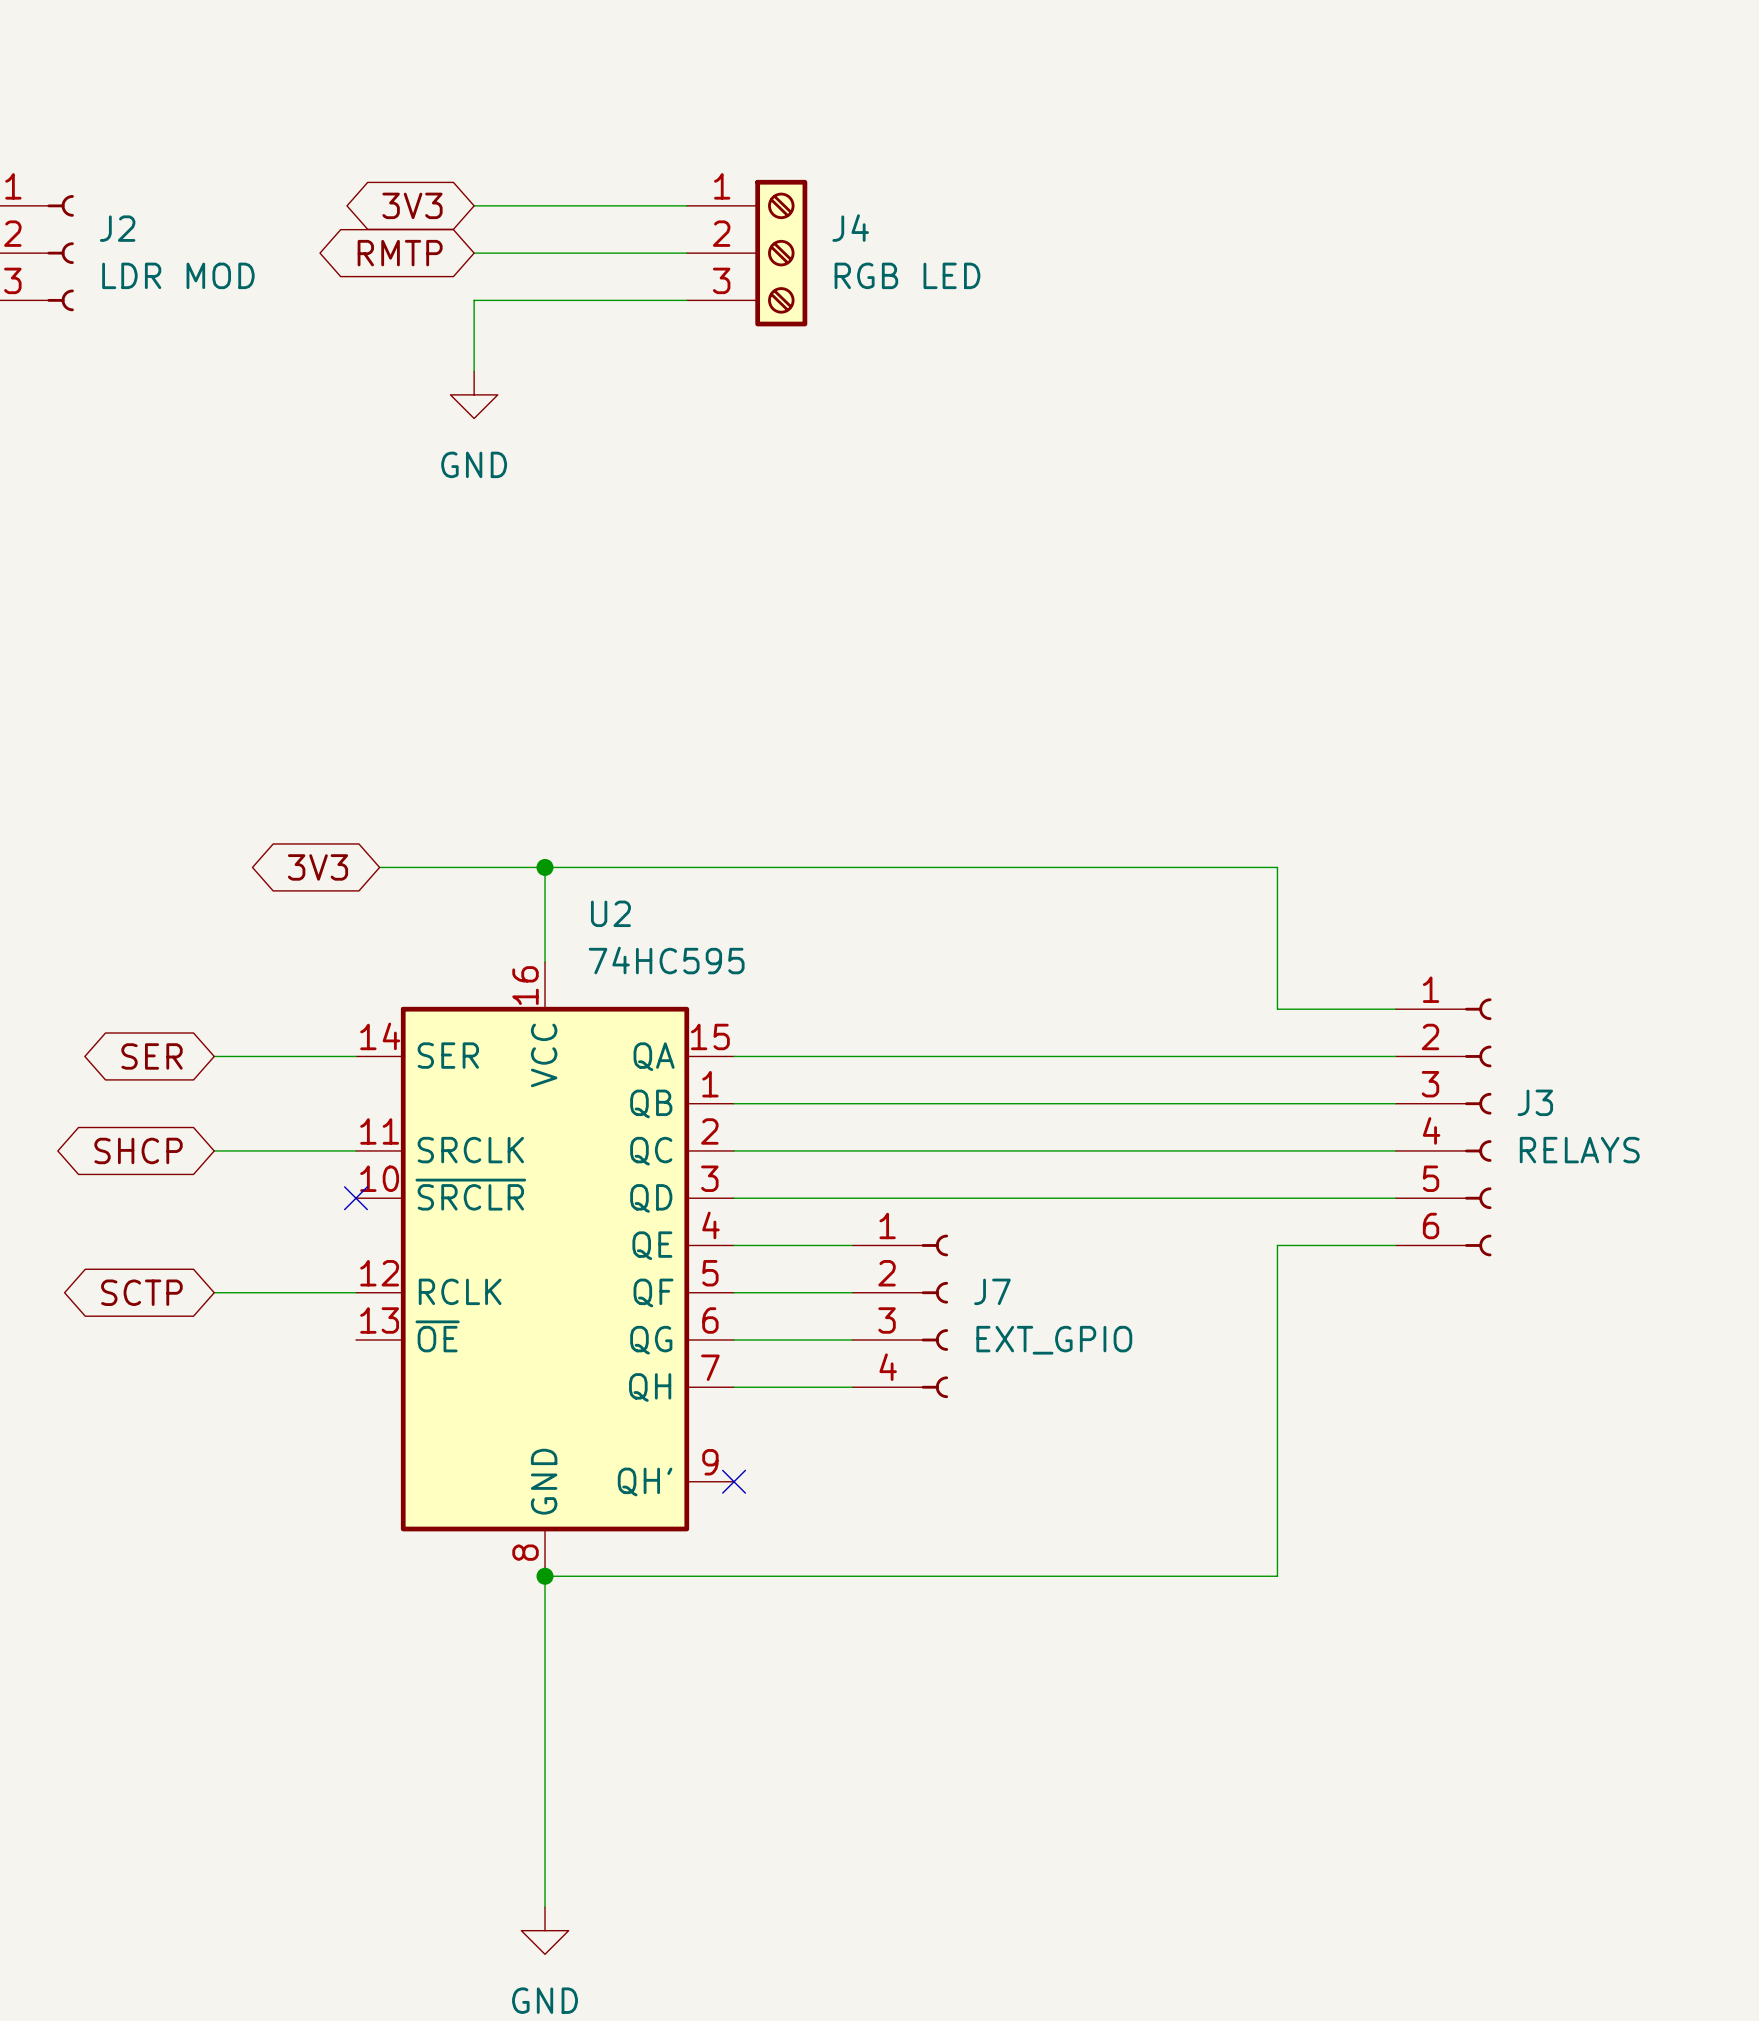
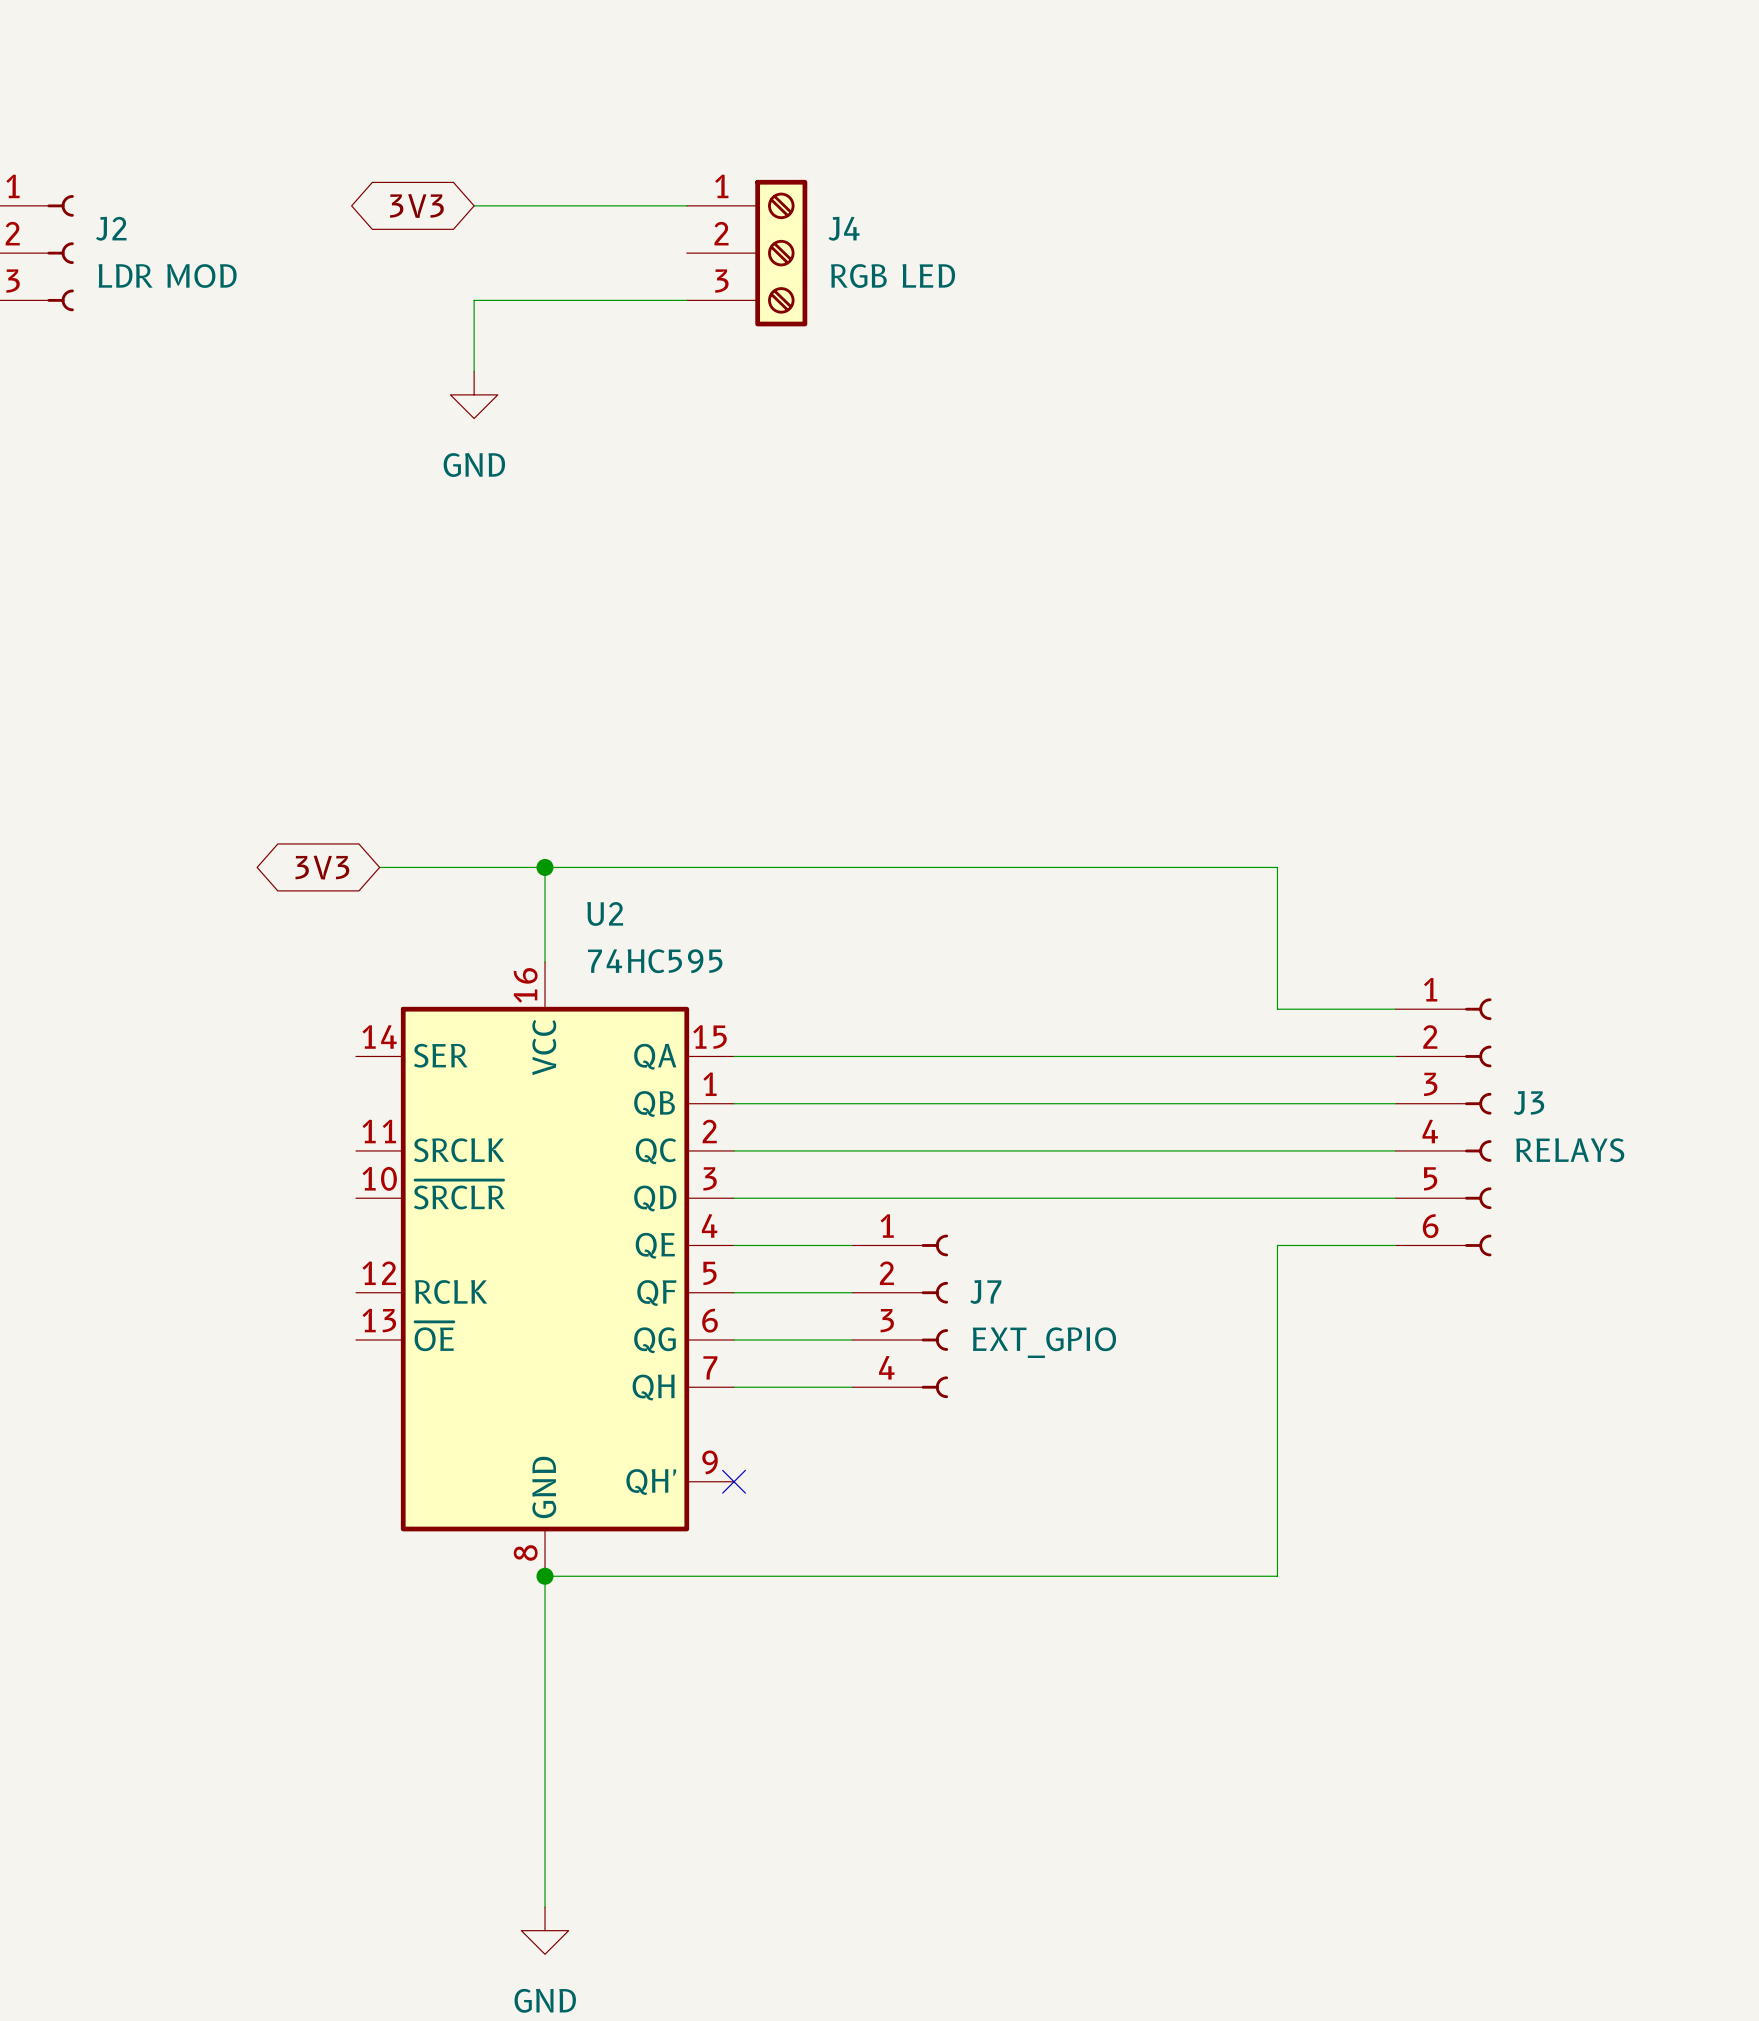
global label: RMTP (400, 253) -> none
wire: (474, 253) (686, 253) -> none
global label: SER (152, 1056) -> none
wire: (214, 1056) (355, 1056) -> none
global label: SHCP (138, 1150) -> none
wire: (214, 1150) (355, 1150) -> none
no-connect mark: (355, 1198) -> none
global label: SCTP (141, 1292) -> none
wire: (214, 1292) (355, 1292) -> none

